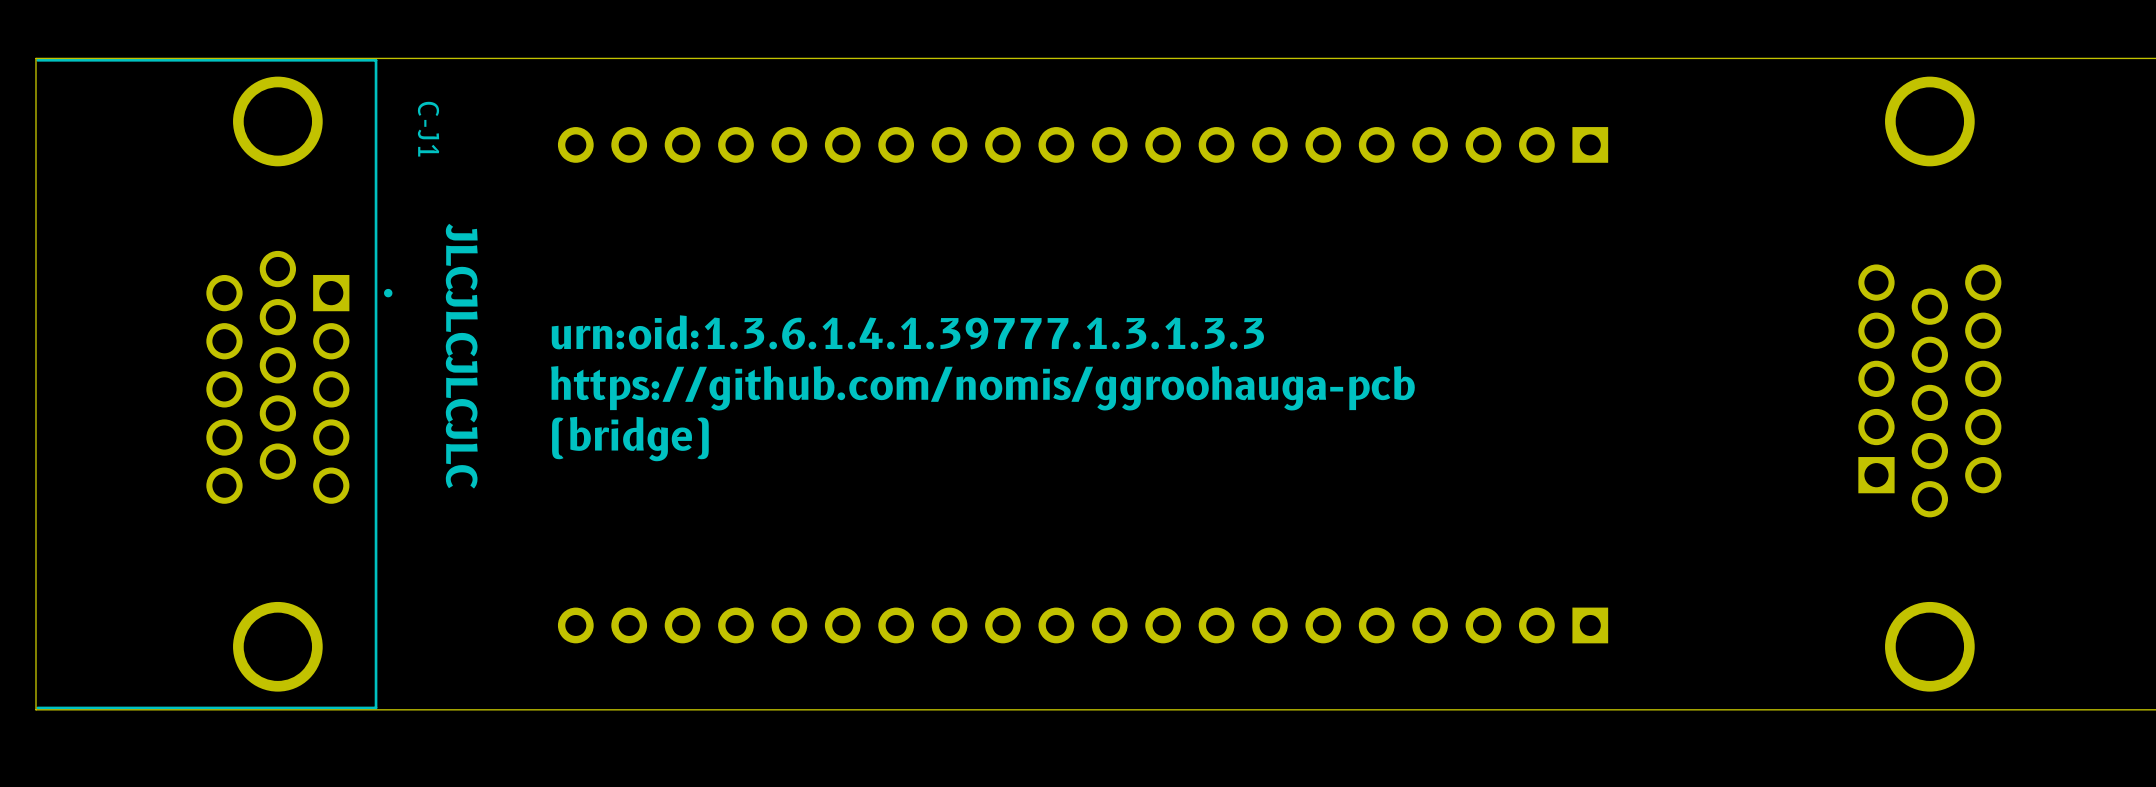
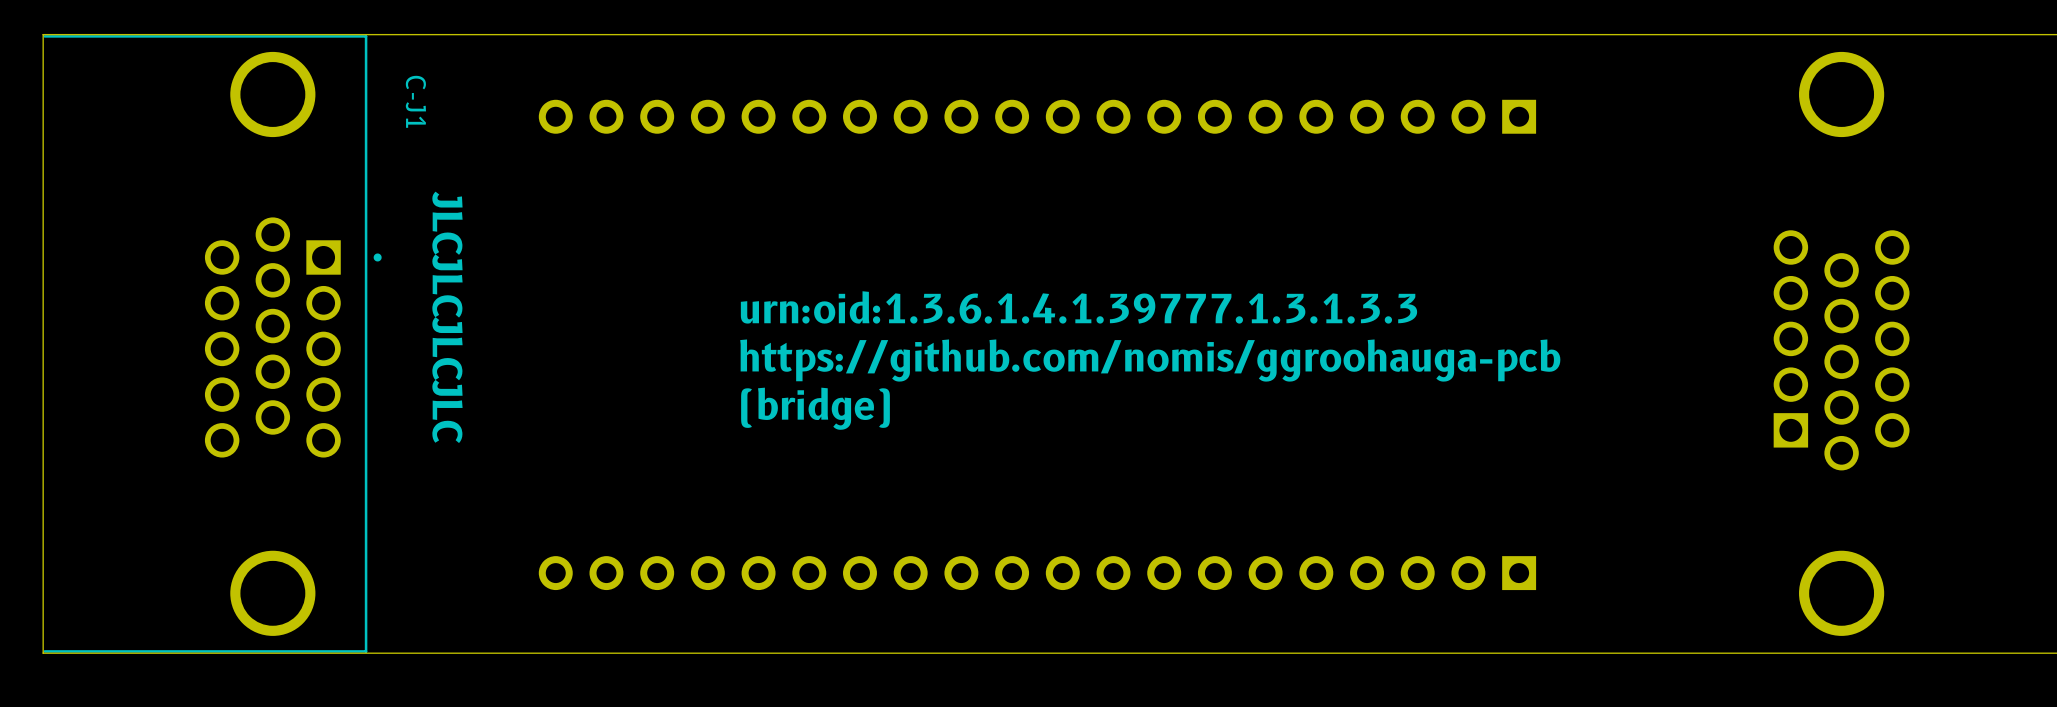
text position: urn:oid:1.3.6.1.4.1.39777.1.3.1.3.3 (907, 332) -> urn:oid:1.3.6.1.4.1.39777.1.3.1.3.3 (1078, 307)
text position: https://github.com/nomis/ggroohauga-pcb (982, 388) -> https://github.com/nomis/ggroohauga-pcb (1150, 360)
text position: (bridge) (630, 439) -> (bridge) (815, 408)

